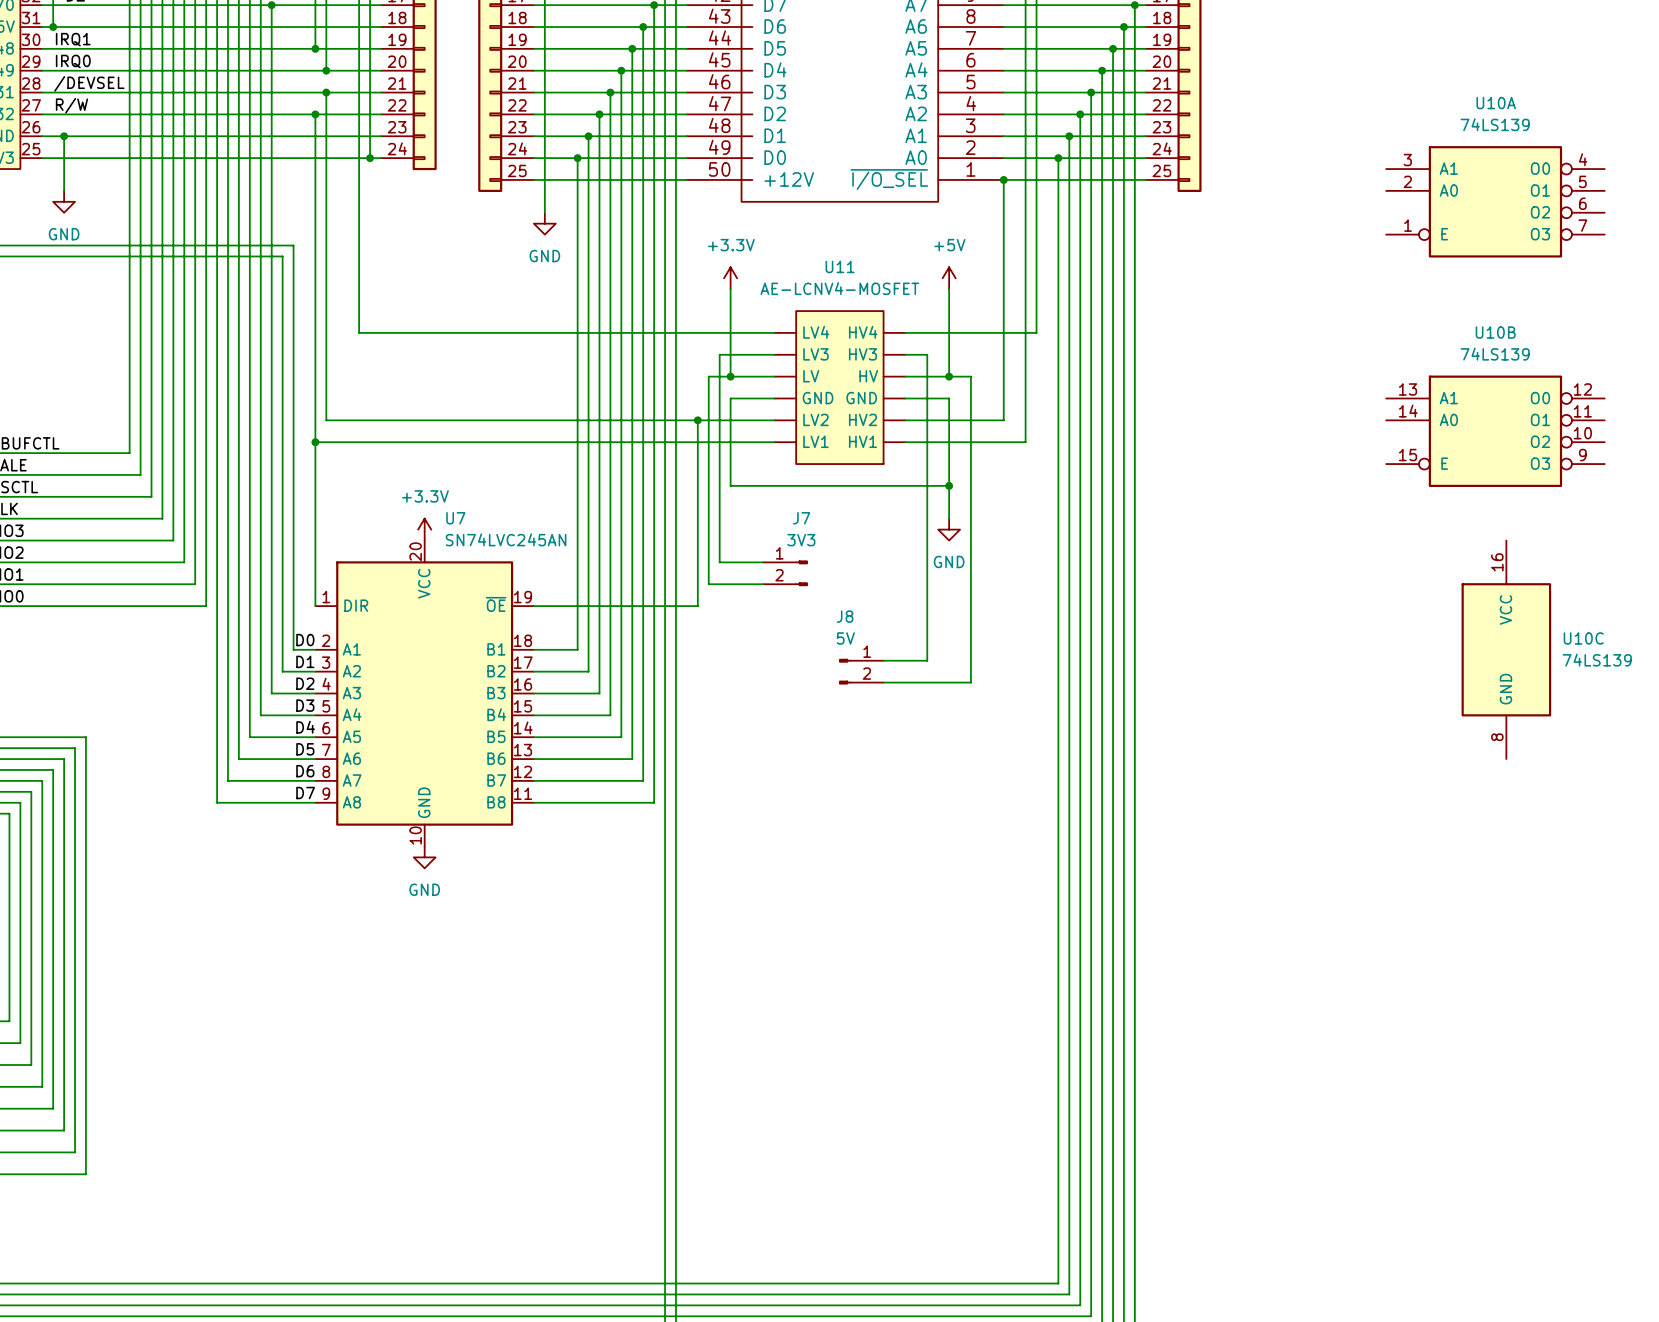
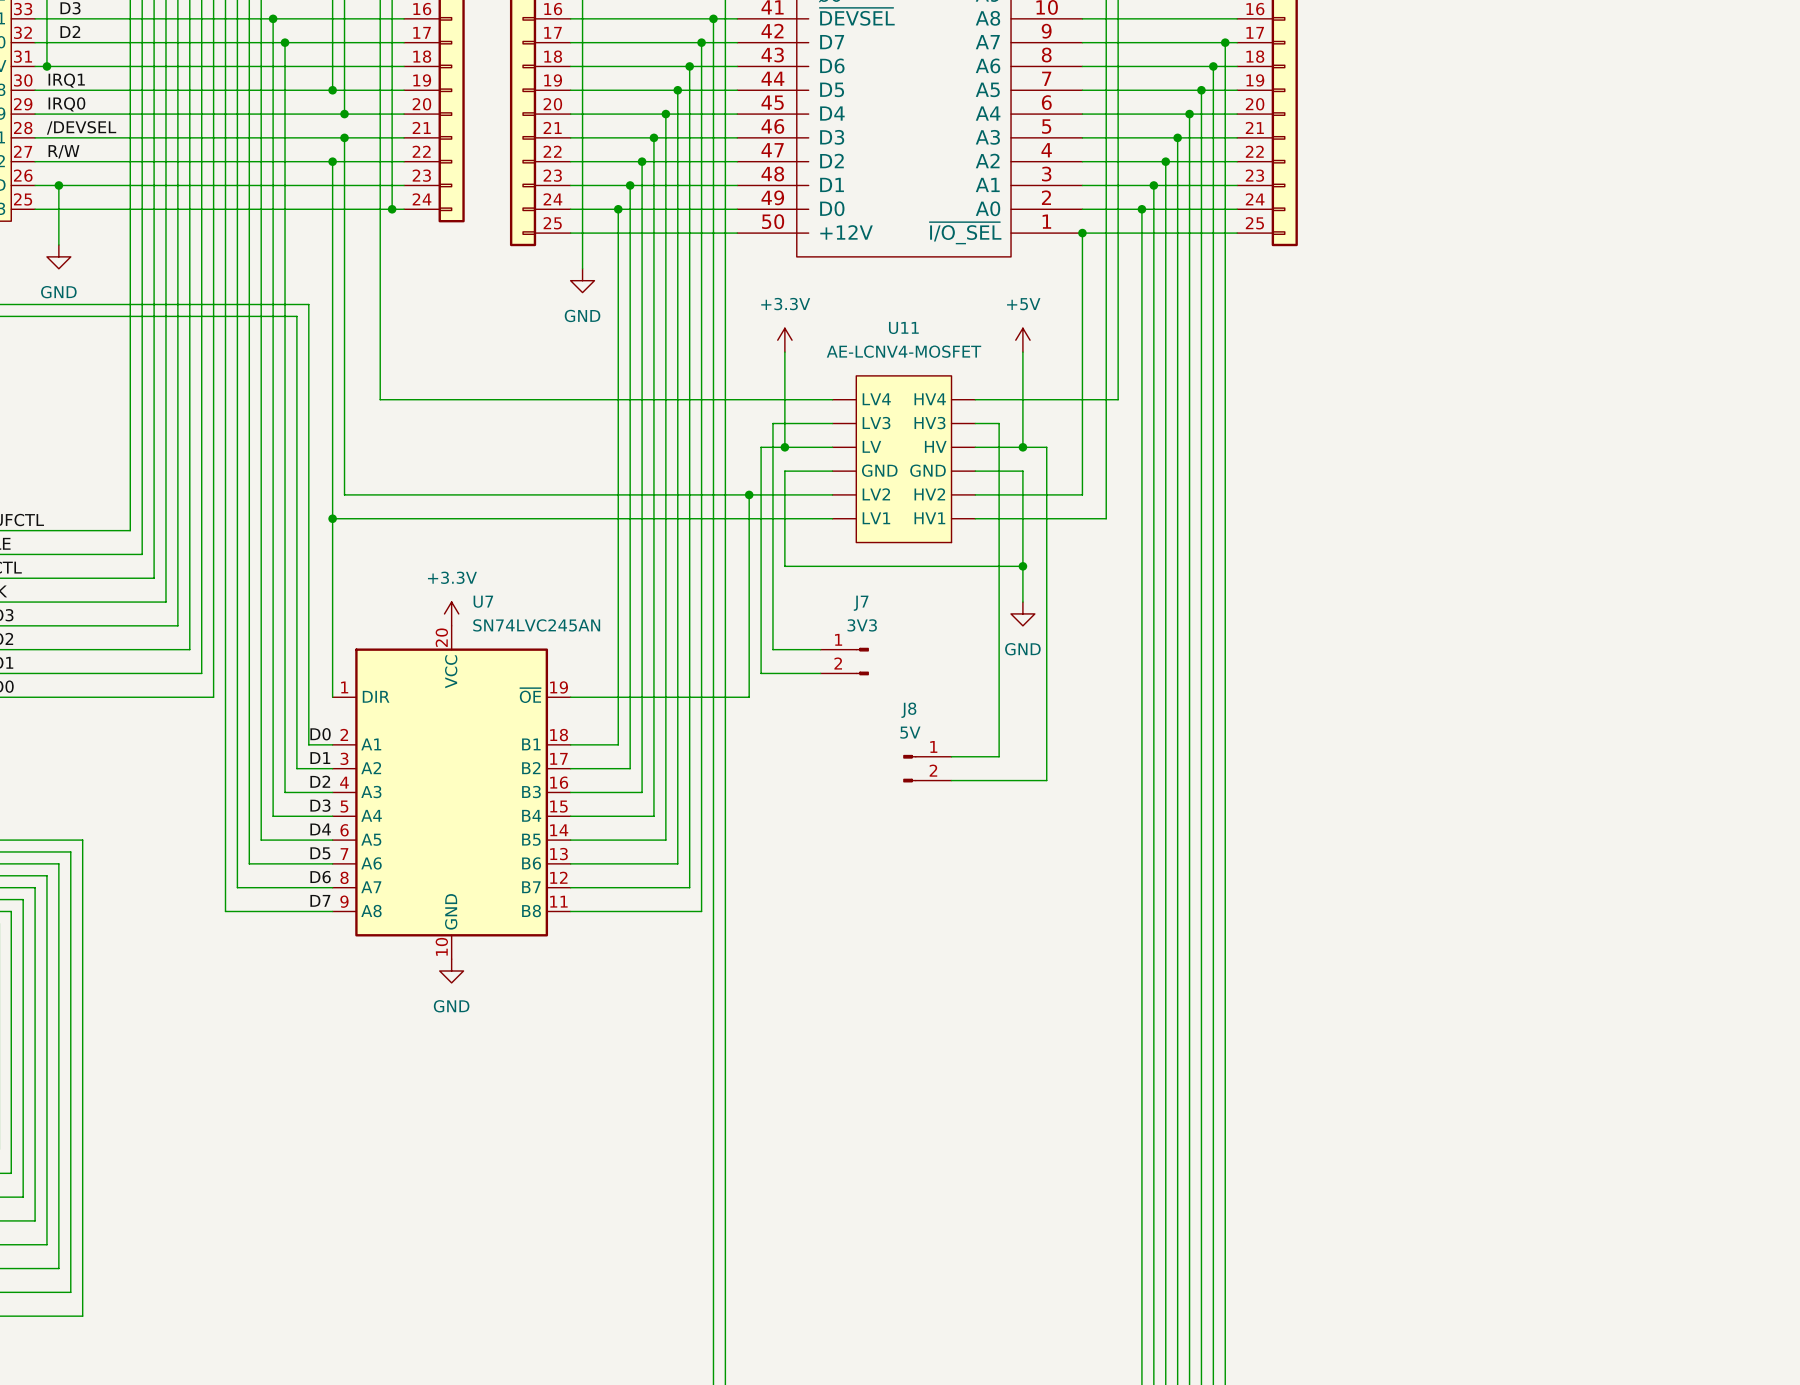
U10A: 74LS139 (1495, 201) -> none
U10B: 74LS139 (1495, 431) -> none
U10C: 74LS139 (1506, 649) -> none

